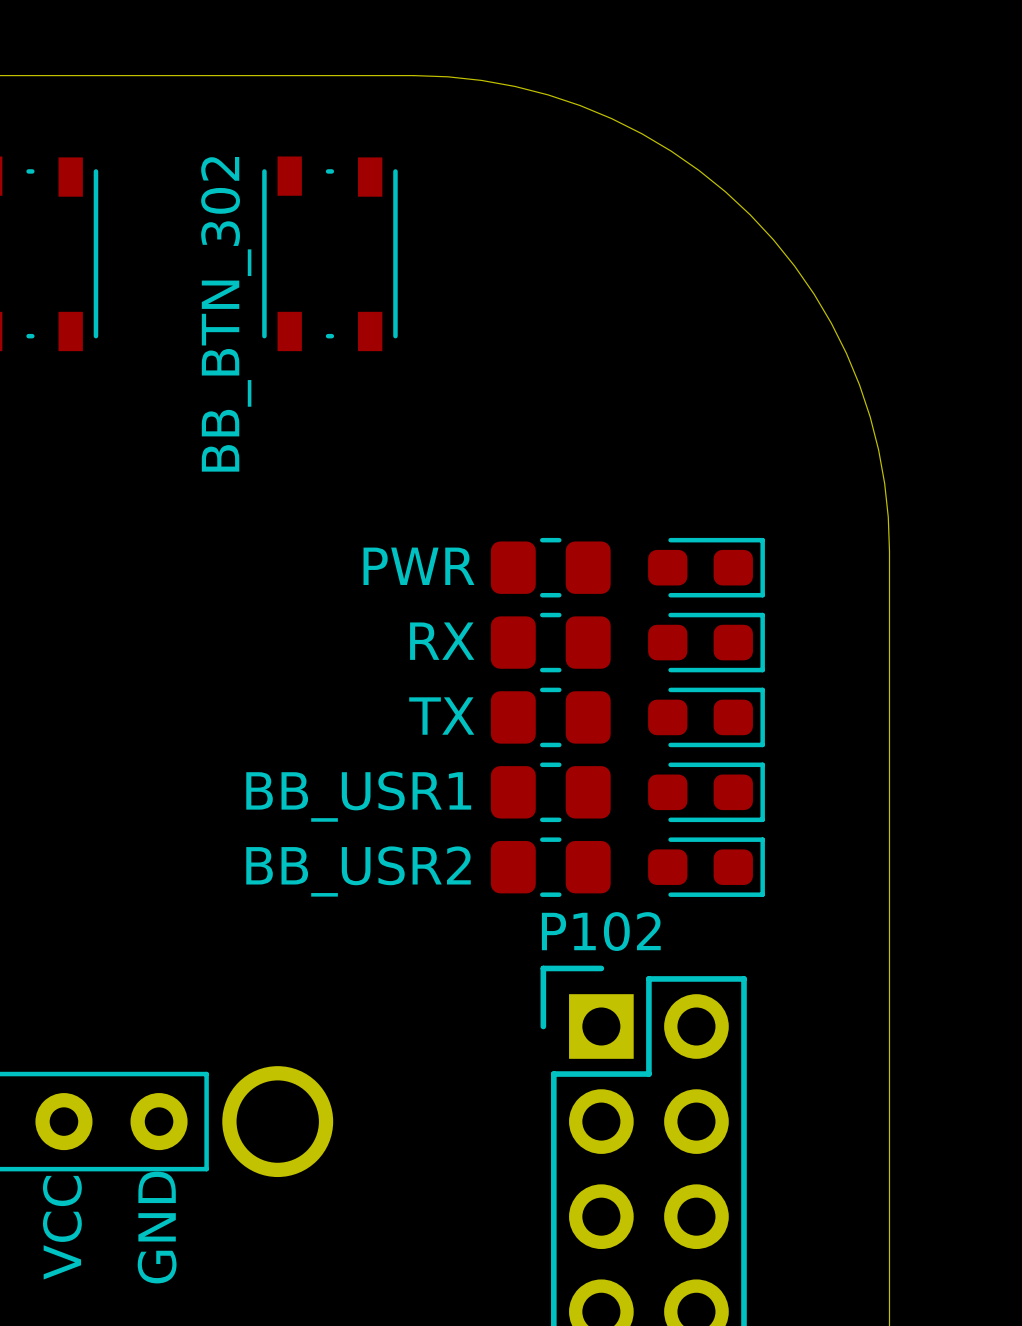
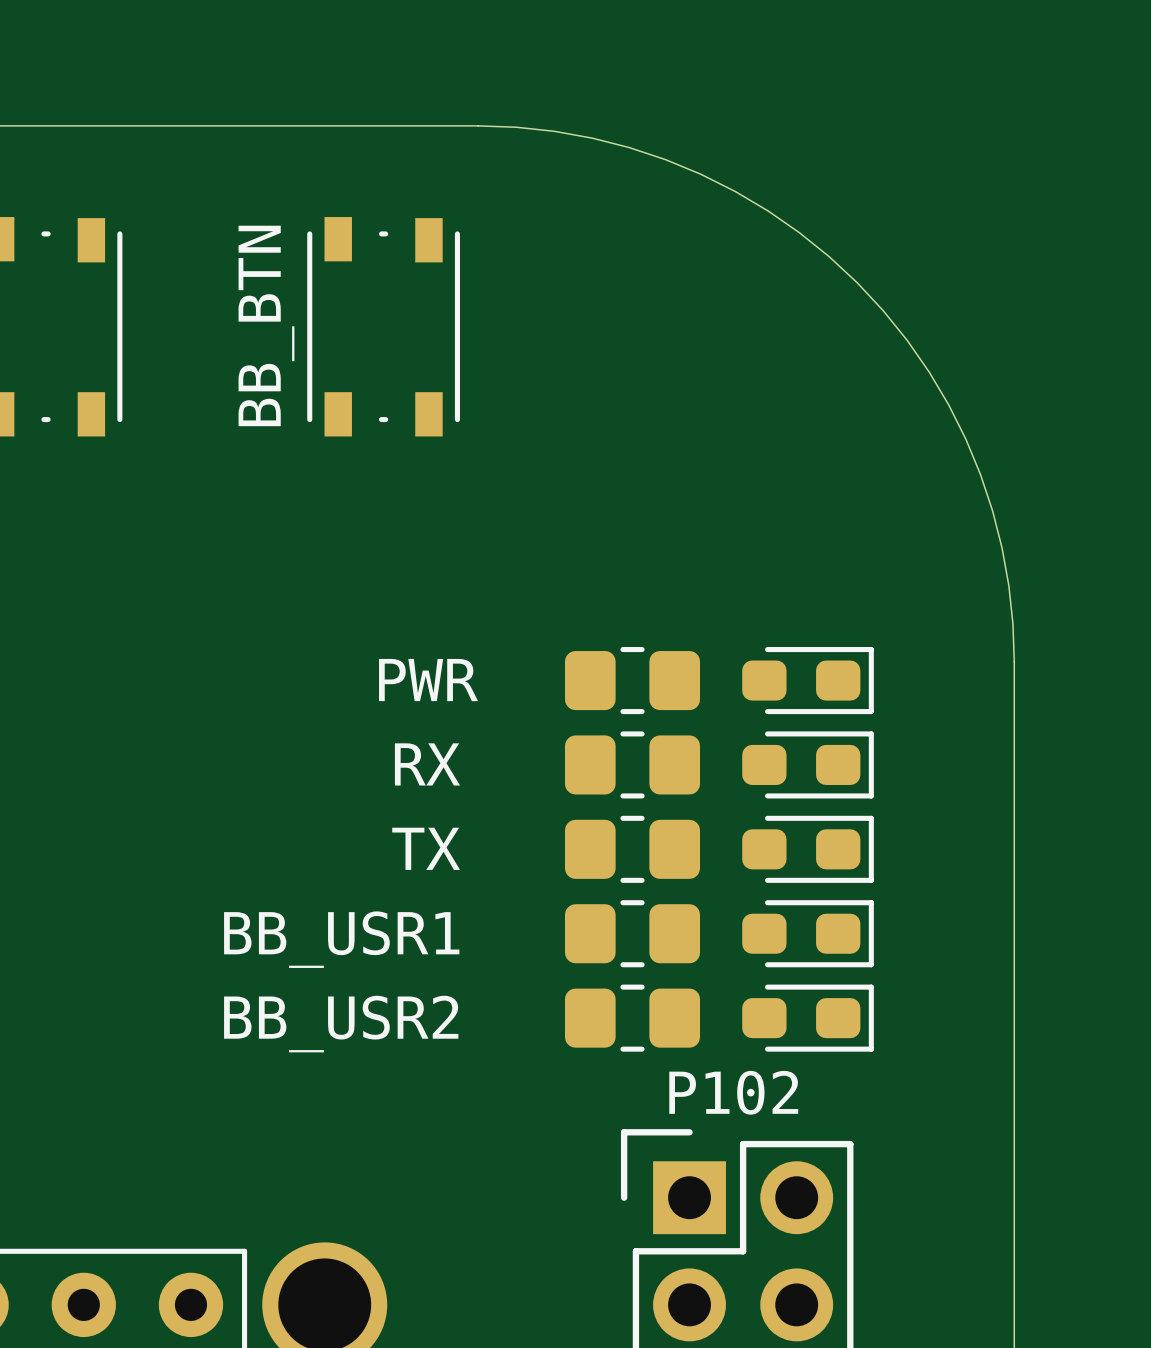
BB_BTN_302 name: BB_BTN_302 (226, 314) -> BB_BTN (266, 325)
PWR name position: PWR (418, 566) -> PWR (428, 680)
RX name position: RX (442, 641) -> RX (427, 764)
TX name position: TX (441, 716) -> TX (426, 848)
BB_USR1 name position: BB_USR1 (358, 796) -> BB_USR1 (341, 939)
BB_USR2 name position: BB_USR2 (358, 871) -> BB_USR2 (341, 1024)
P102 name position: P102 (601, 931) -> P102 (733, 1092)

